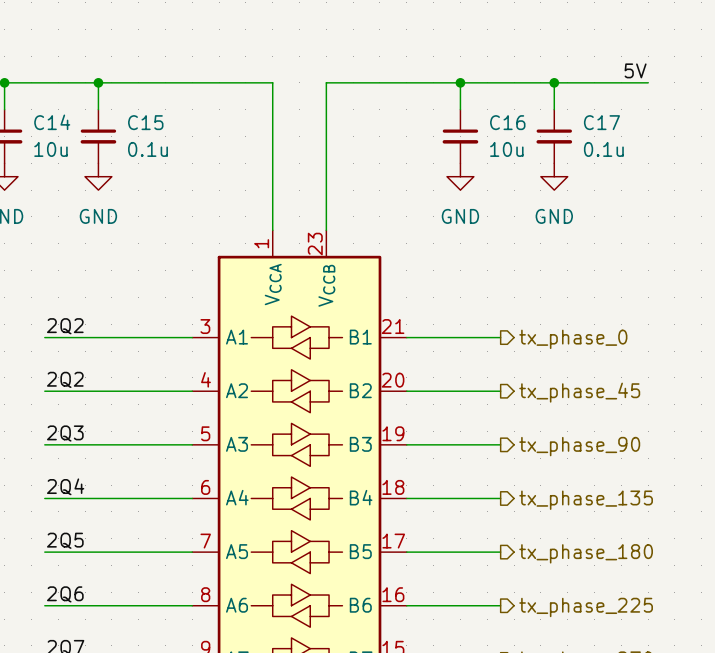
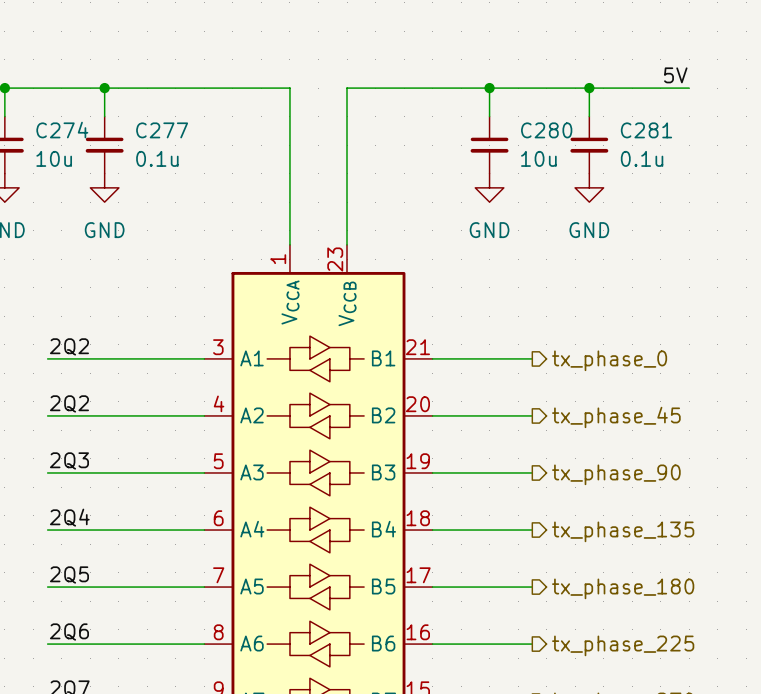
C14 name: C14 (52, 122) -> C274 (62, 130)
C15 name: C15 (145, 122) -> C277 (162, 130)
C16 name: C16 (507, 122) -> C280 (546, 130)
C17 name: C17 (601, 122) -> C281 (646, 130)

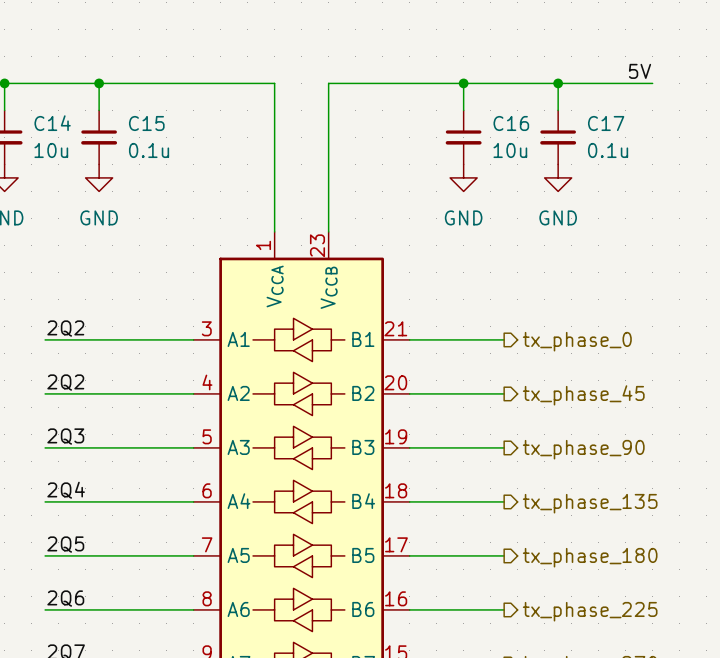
C274 name: C274 (62, 130) -> C14 (52, 123)
C277 name: C277 (162, 130) -> C15 (146, 123)
C280 name: C280 (546, 130) -> C16 (511, 123)
C281 name: C281 (646, 130) -> C17 (606, 123)

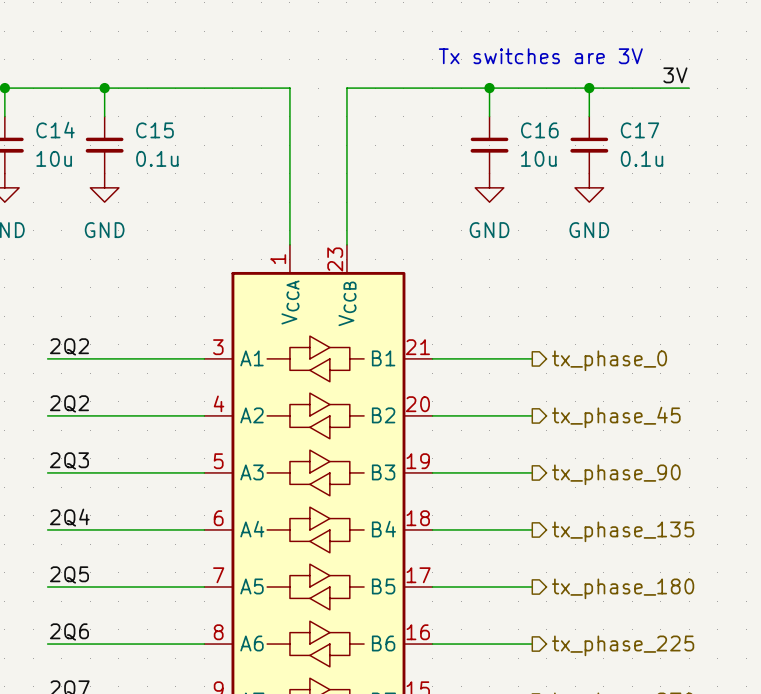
text: none -> Tx switches are 3V (540, 56)
label: 5V (640, 71) -> 3V (675, 75)

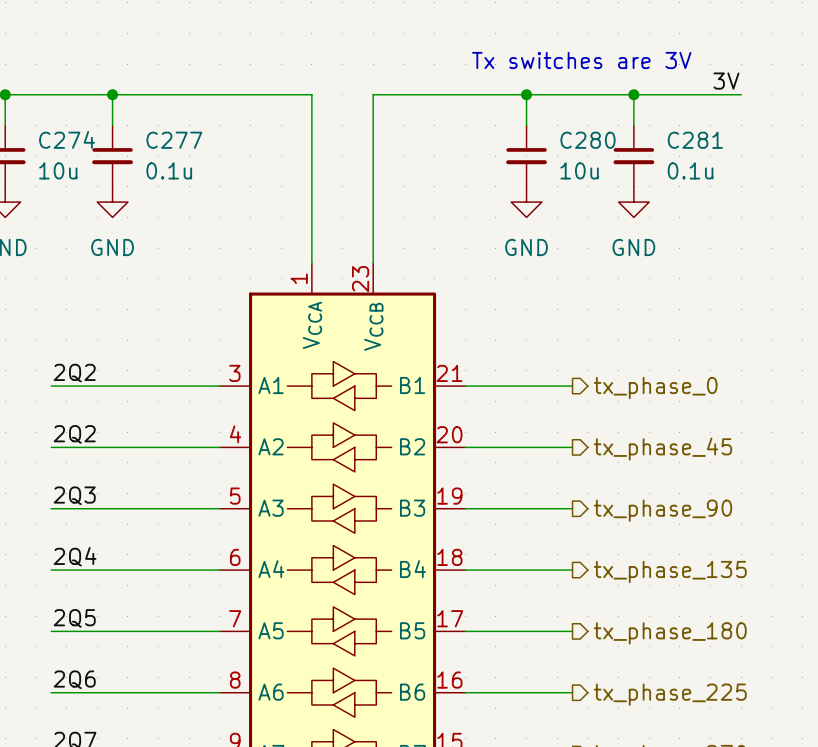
C14 name: C14 (55, 130) -> C274 (67, 139)
C15 name: C15 (154, 130) -> C277 (174, 140)
C16 name: C16 (539, 130) -> C280 (587, 140)
C17 name: C17 (639, 130) -> C281 (695, 140)

